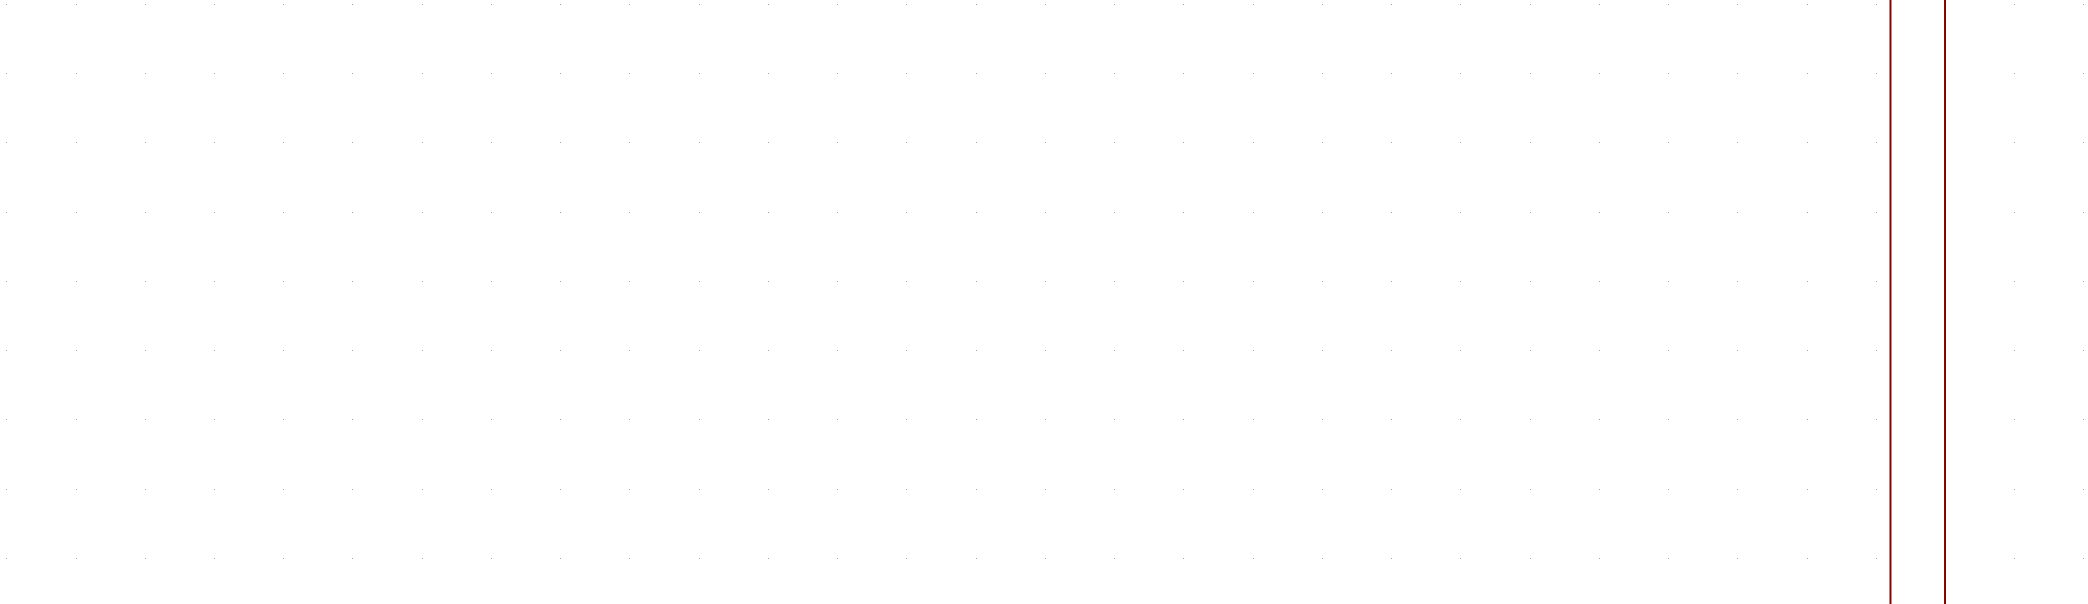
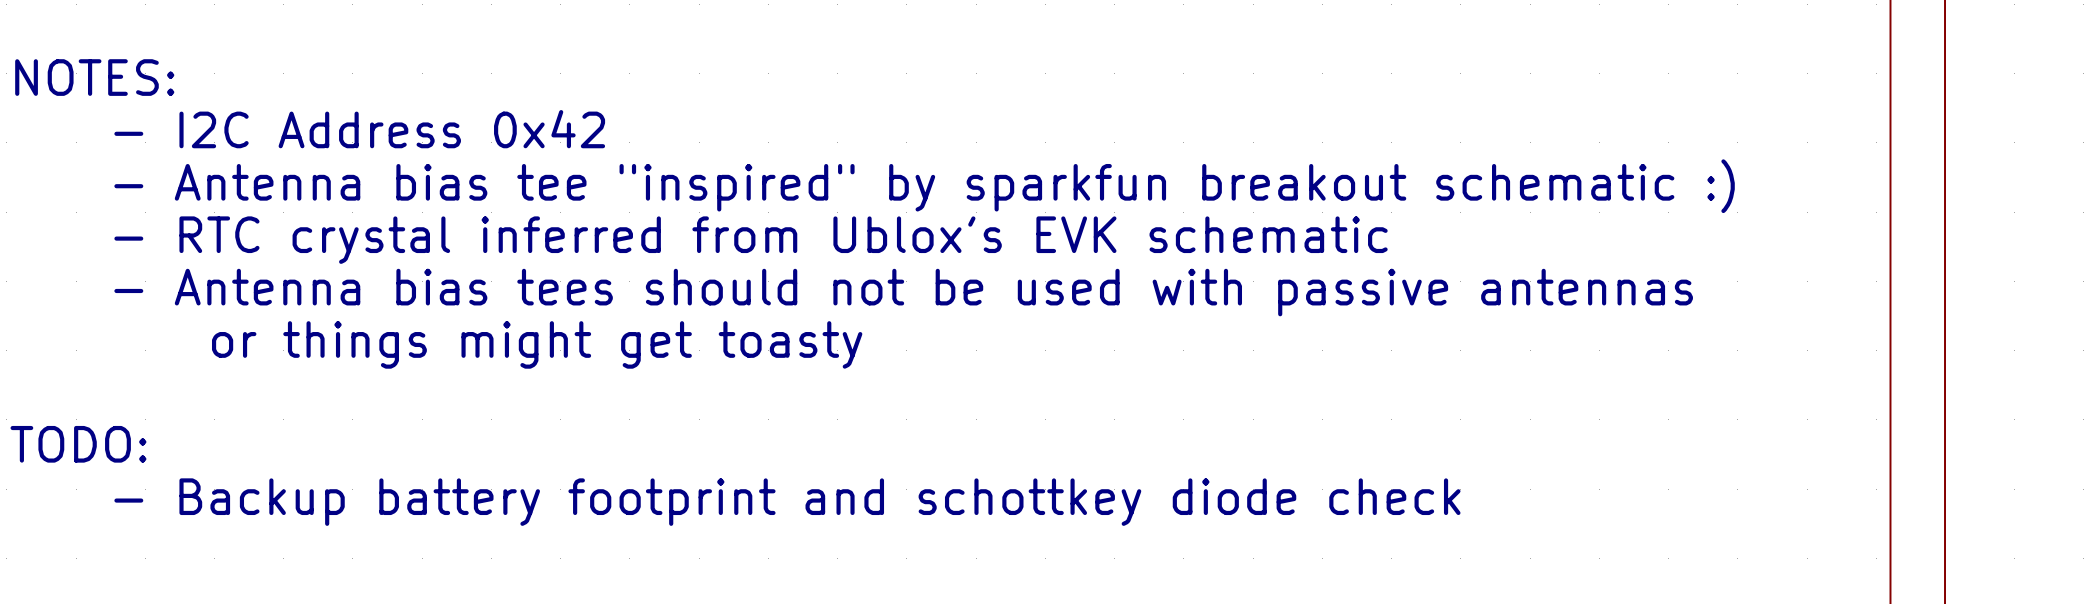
text: none -> NOTES: (94, 77)
text: none -> - I2C Address 0x42 (359, 129)
text: none -> - Antenna bias tee "inspired" by sparkfun breakout schematic :) (924, 186)
text: none -> - RTC crystal inferred from Ublox's EVK schematic (751, 240)
text: none -> - Antenna bias tees should not be used with passive antennas (903, 292)
text: none -> or things might get toasty (537, 344)
text: none -> TODO: (78, 444)
text: none -> - Backup battery footprint and schottkey diode check (787, 502)

